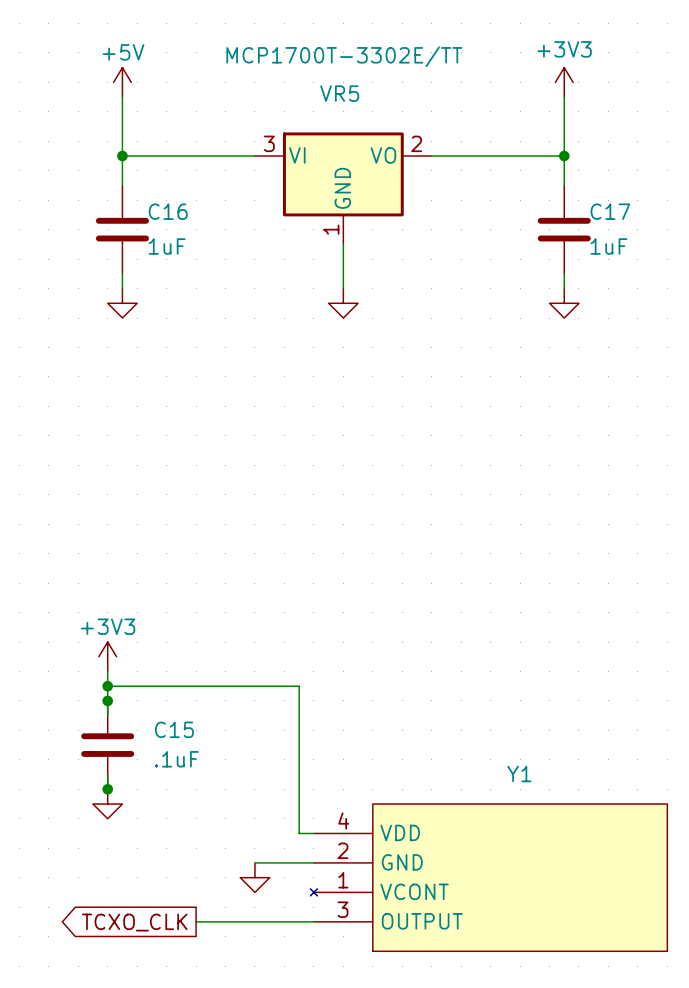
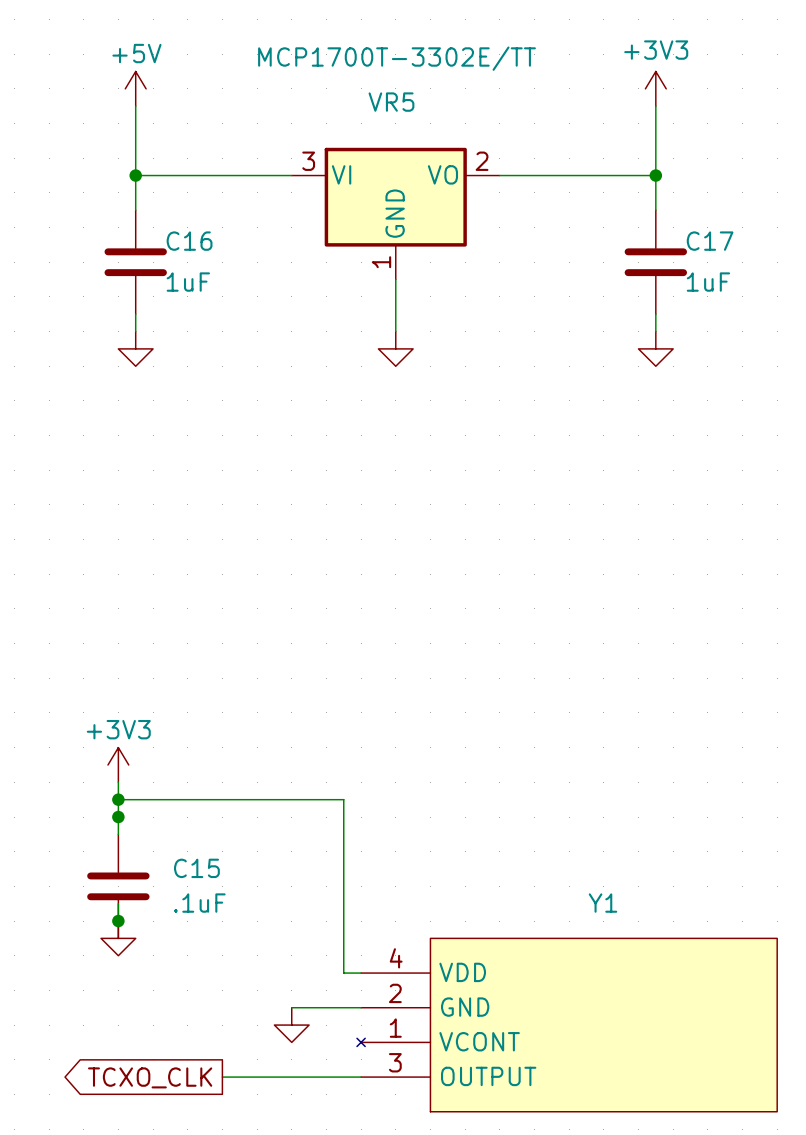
C15 position: (107, 745) -> (118, 886)

